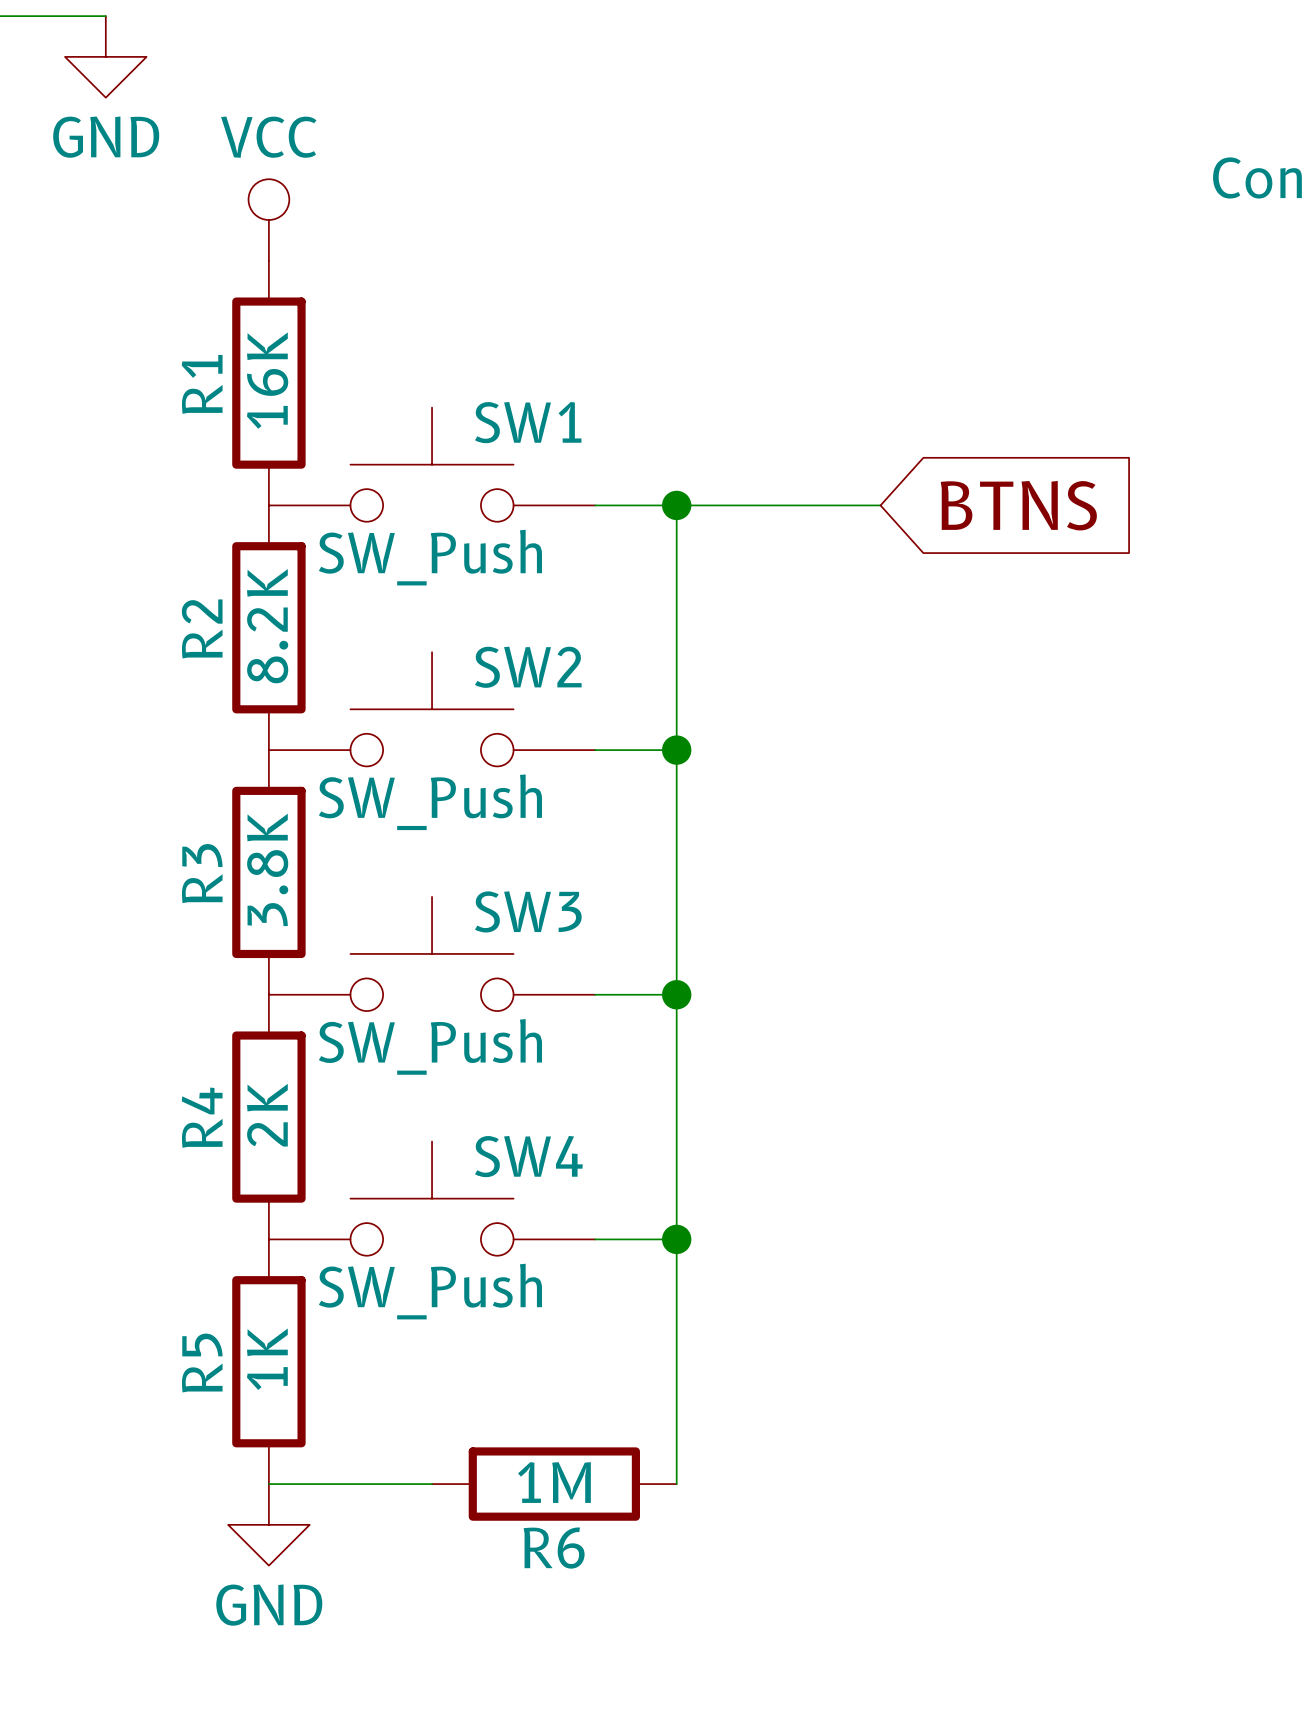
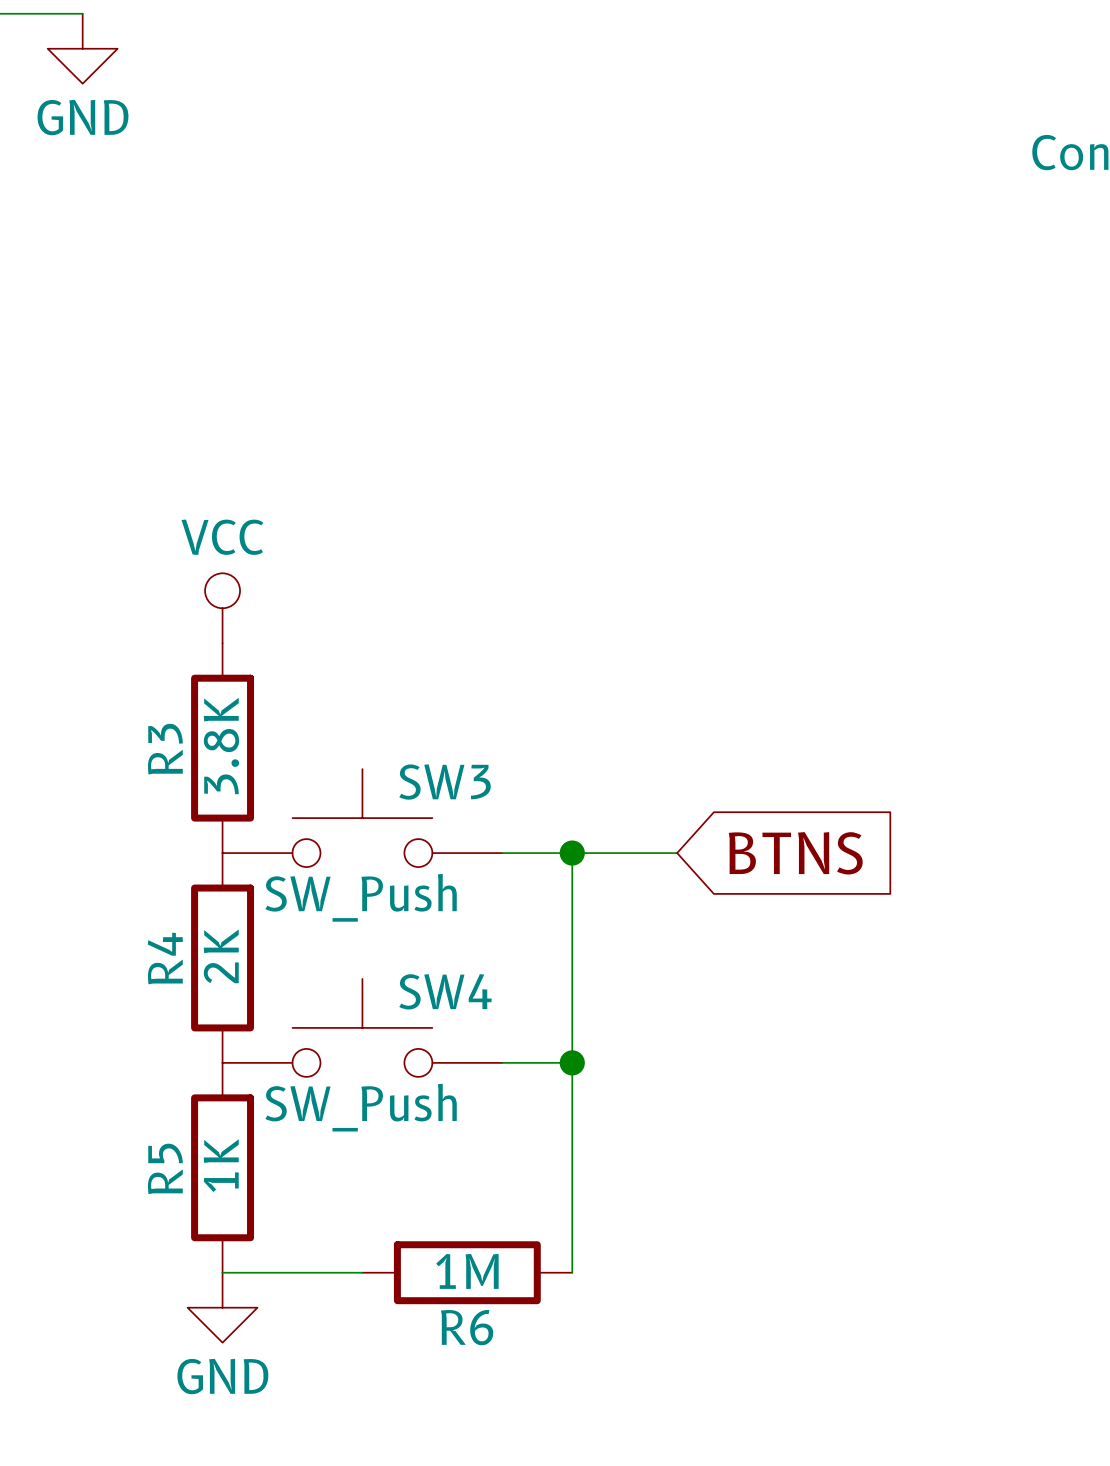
power symbol position: VCC (268, 220) -> VCC (222, 608)
R1: 16K (268, 383) -> none
SW1: SW_Push (432, 464) -> none
wire: (595, 505) (880, 505) -> none
wire: (676, 505) (676, 994) -> (677, 853) (572, 853)
junction: (676, 505) -> none
global label position: BTNS (1018, 505) -> BTNS (795, 853)
R2: 8.2K (268, 627) -> none
SW2: SW_Push (432, 709) -> none
wire: (595, 750) (676, 750) -> none
junction: (676, 750) -> none

